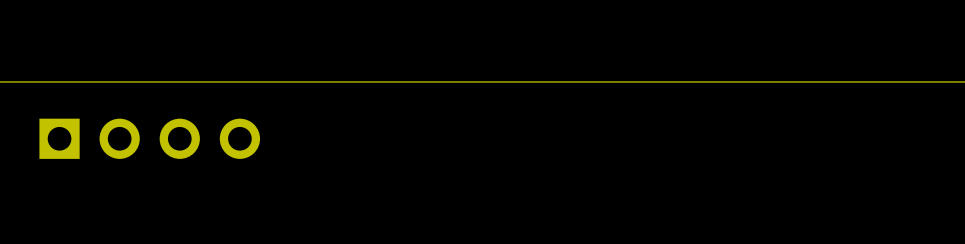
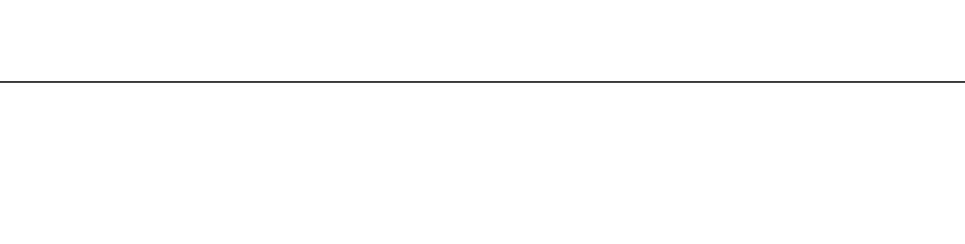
part: (149, 138) -> none

